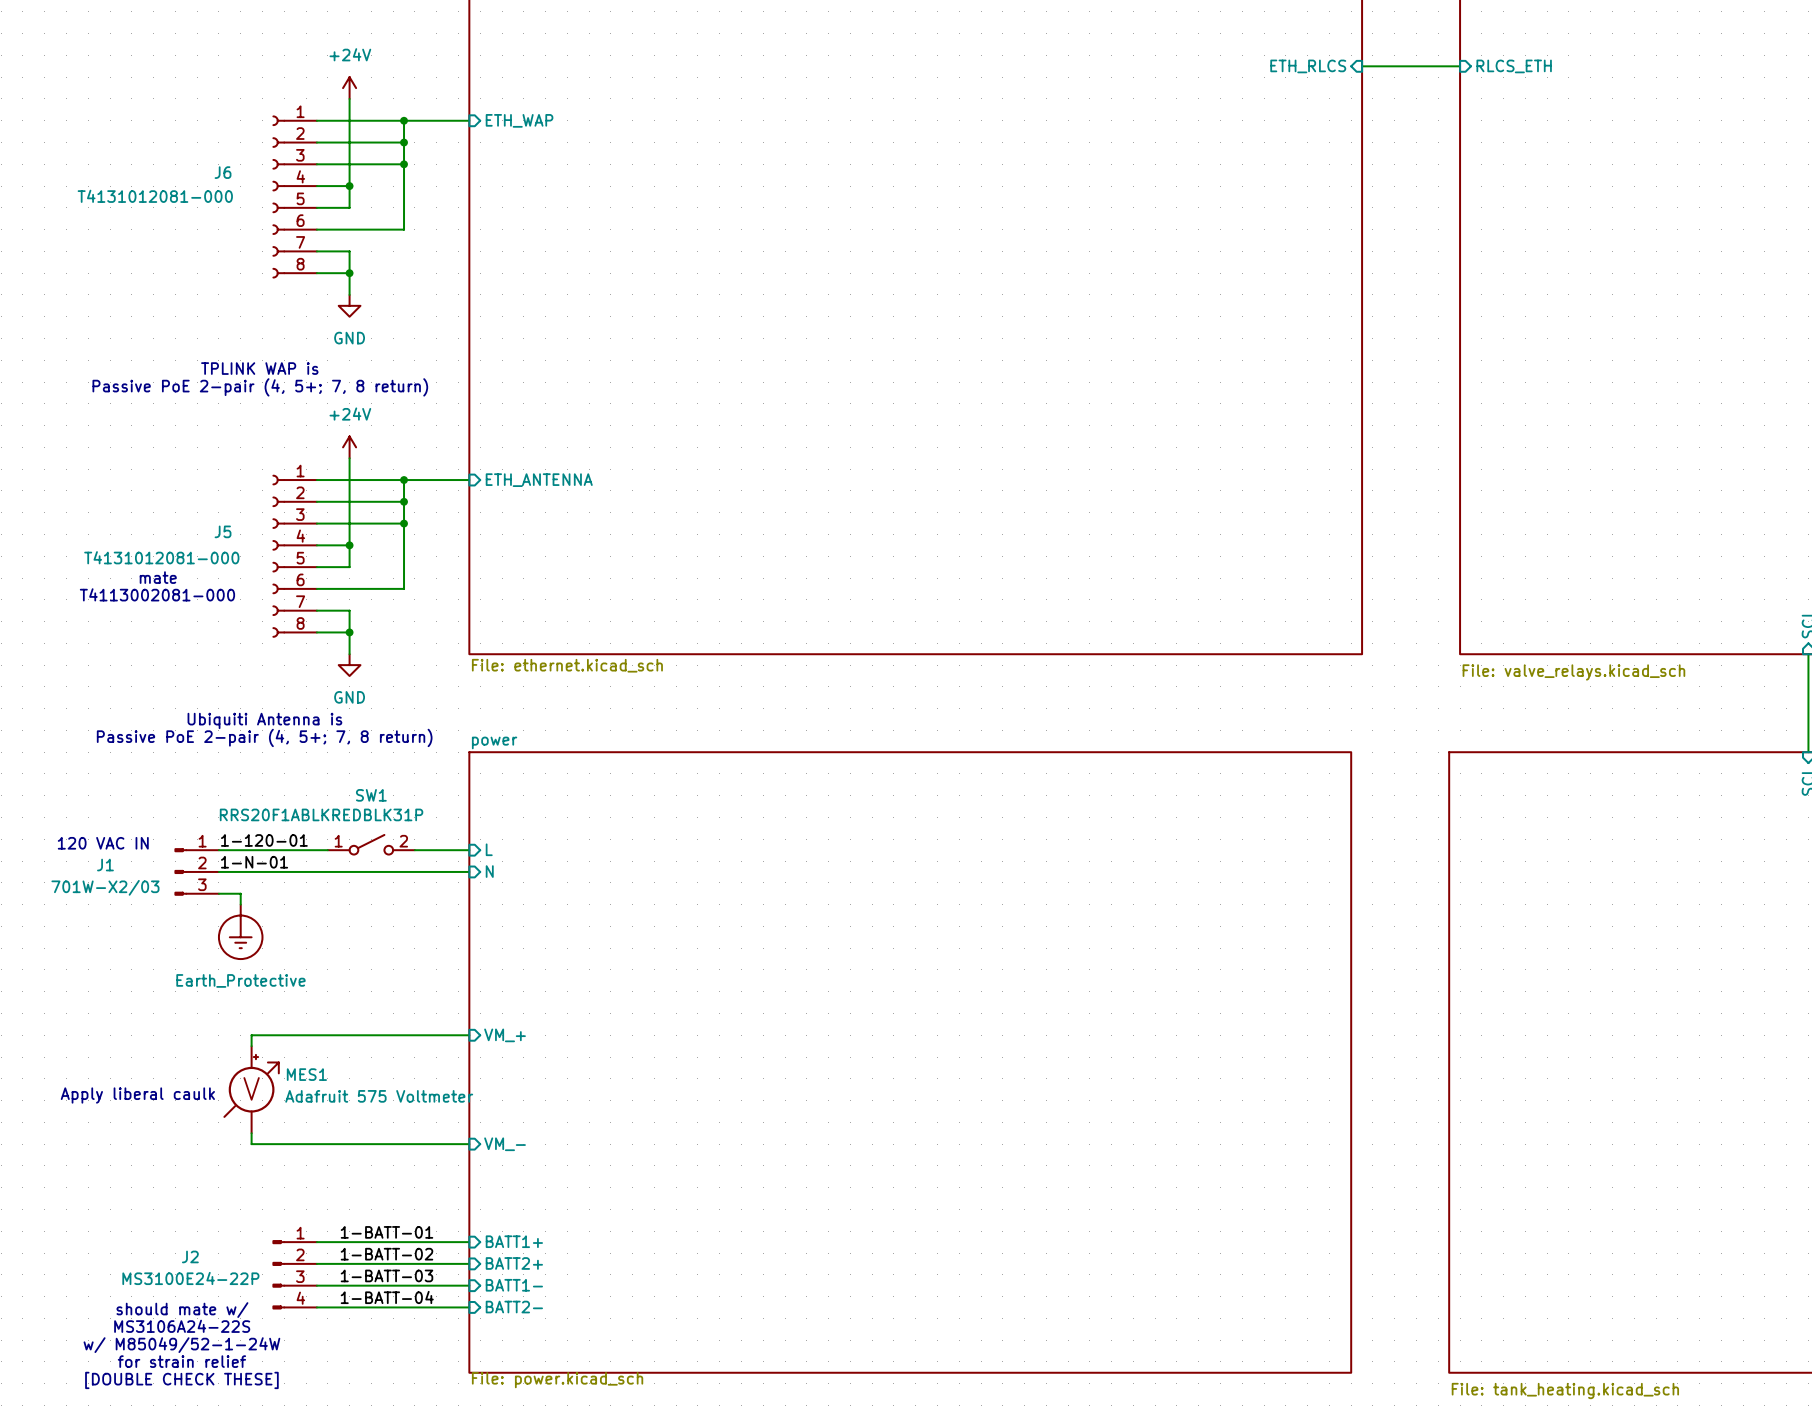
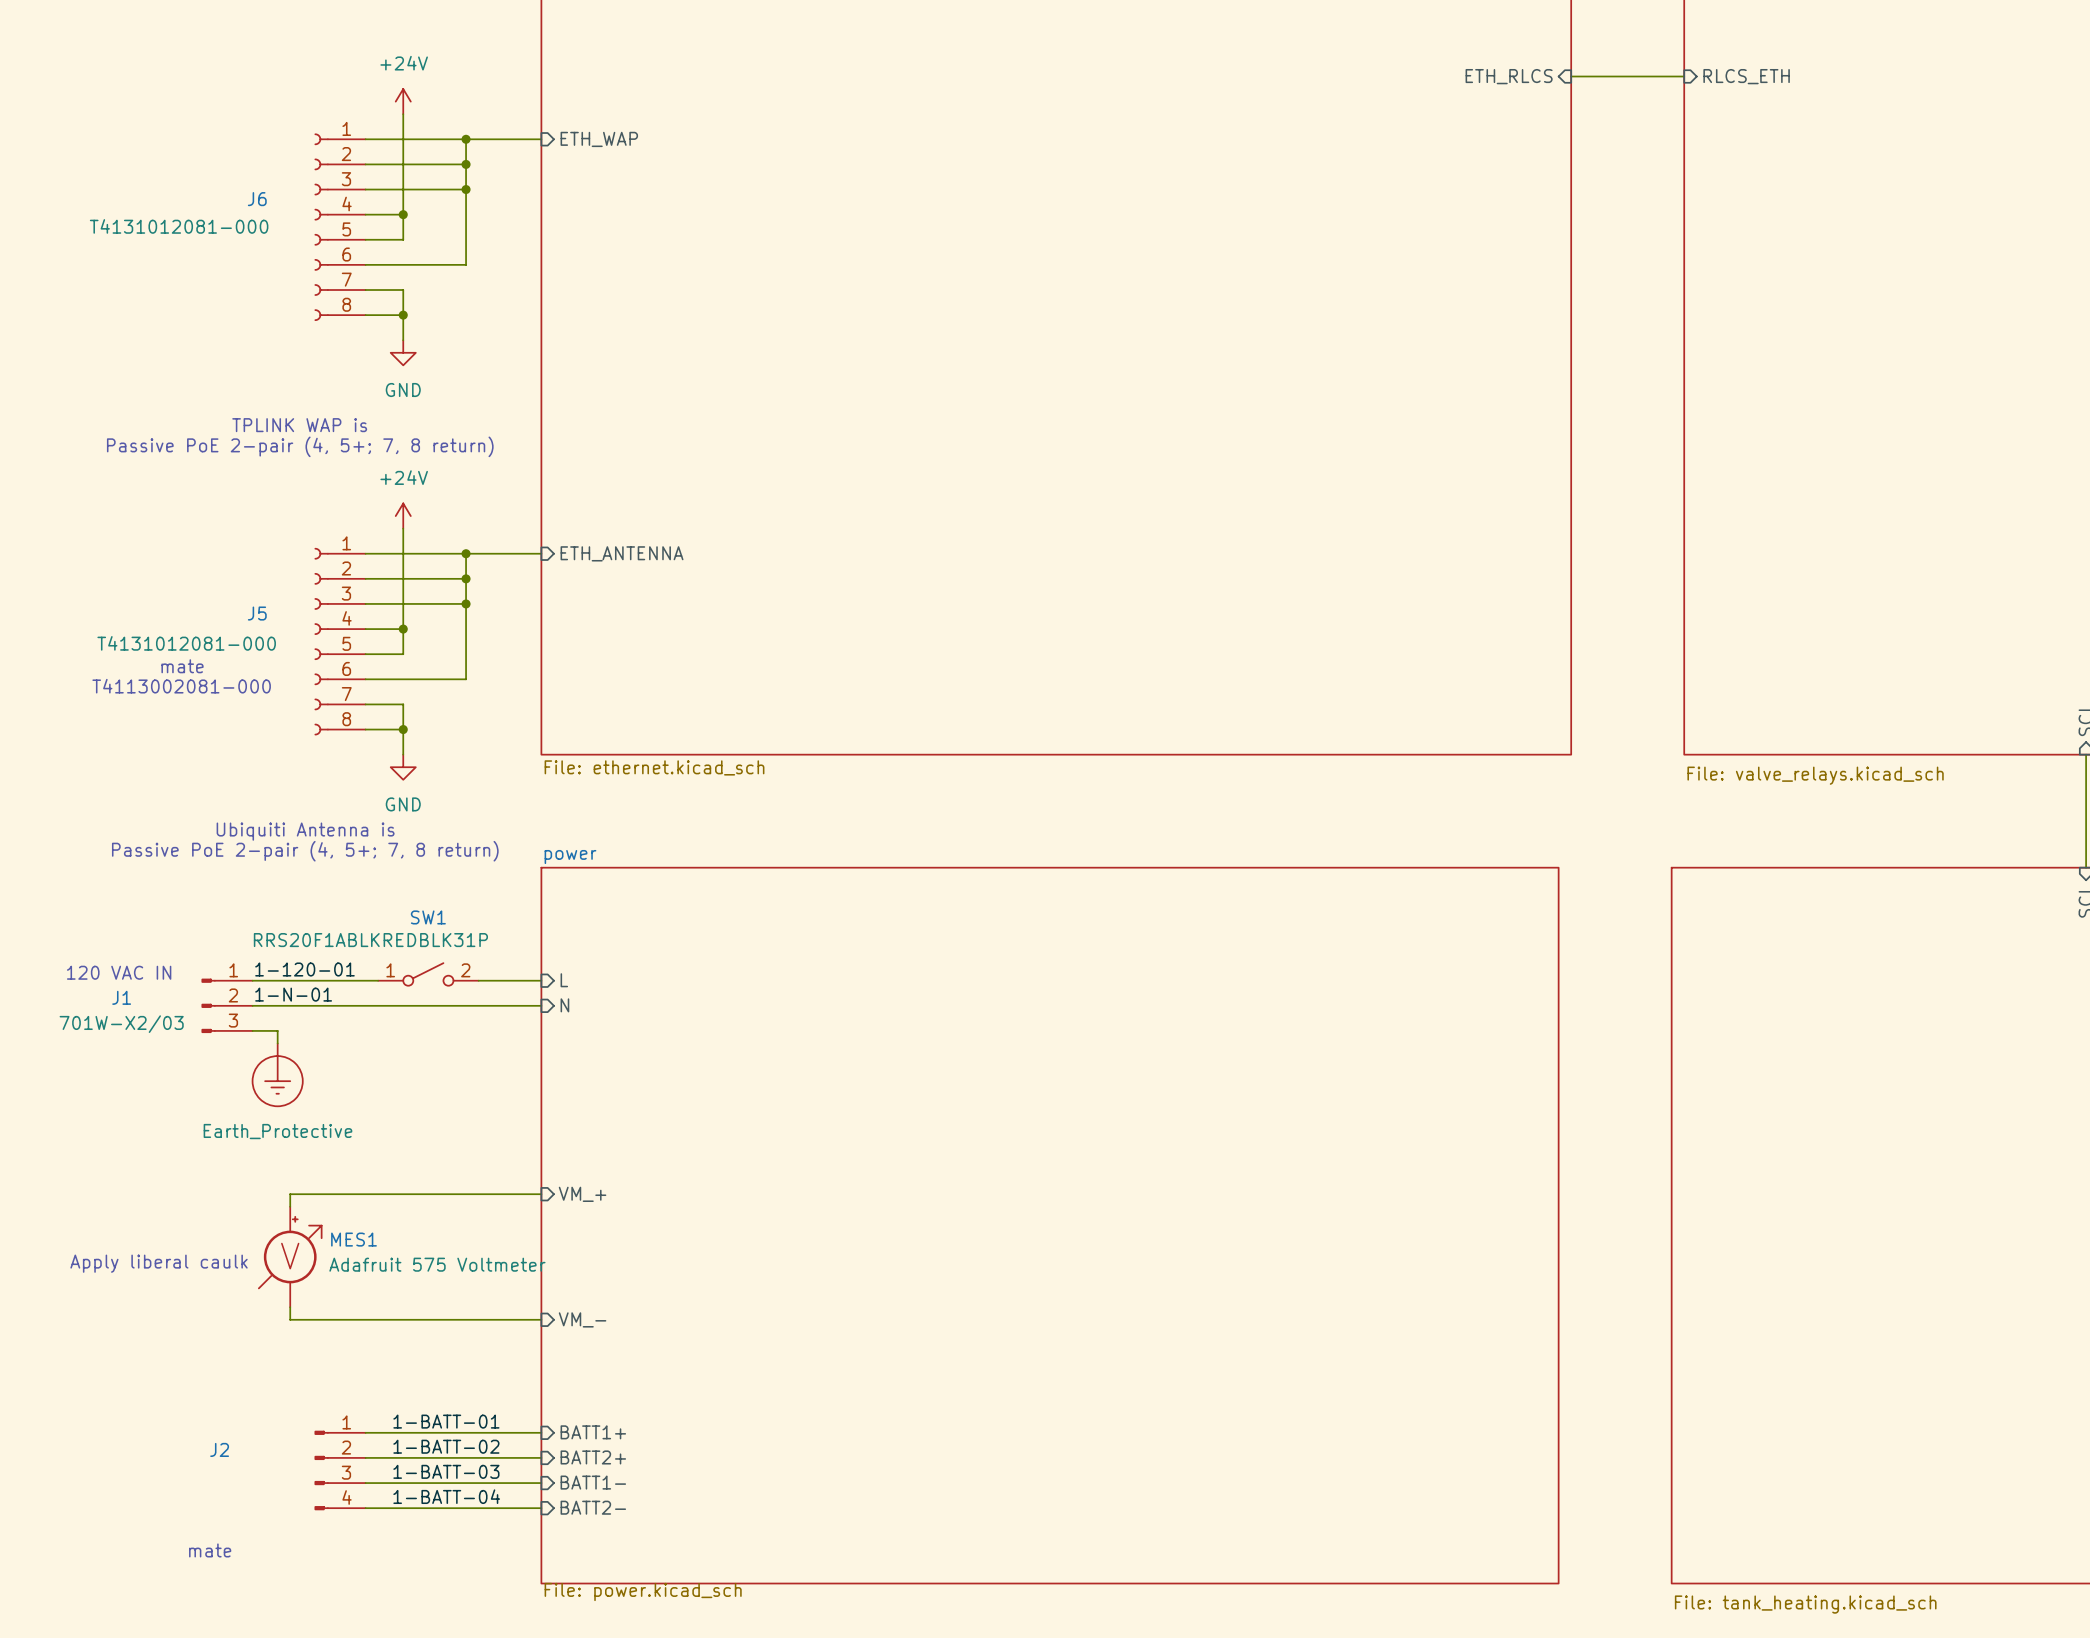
J2 value: MS3100E24-22P (190, 1278) -> none
text: should mate w/ (182, 1310) -> none
text: MS3106A24-22S (182, 1326) -> none
text: w/ M85049/52-1-24W (181, 1345) -> mate (210, 1550)
text: for strain relief (181, 1361) -> none
text: [DOUBLE CHECK THESE] (181, 1380) -> none

